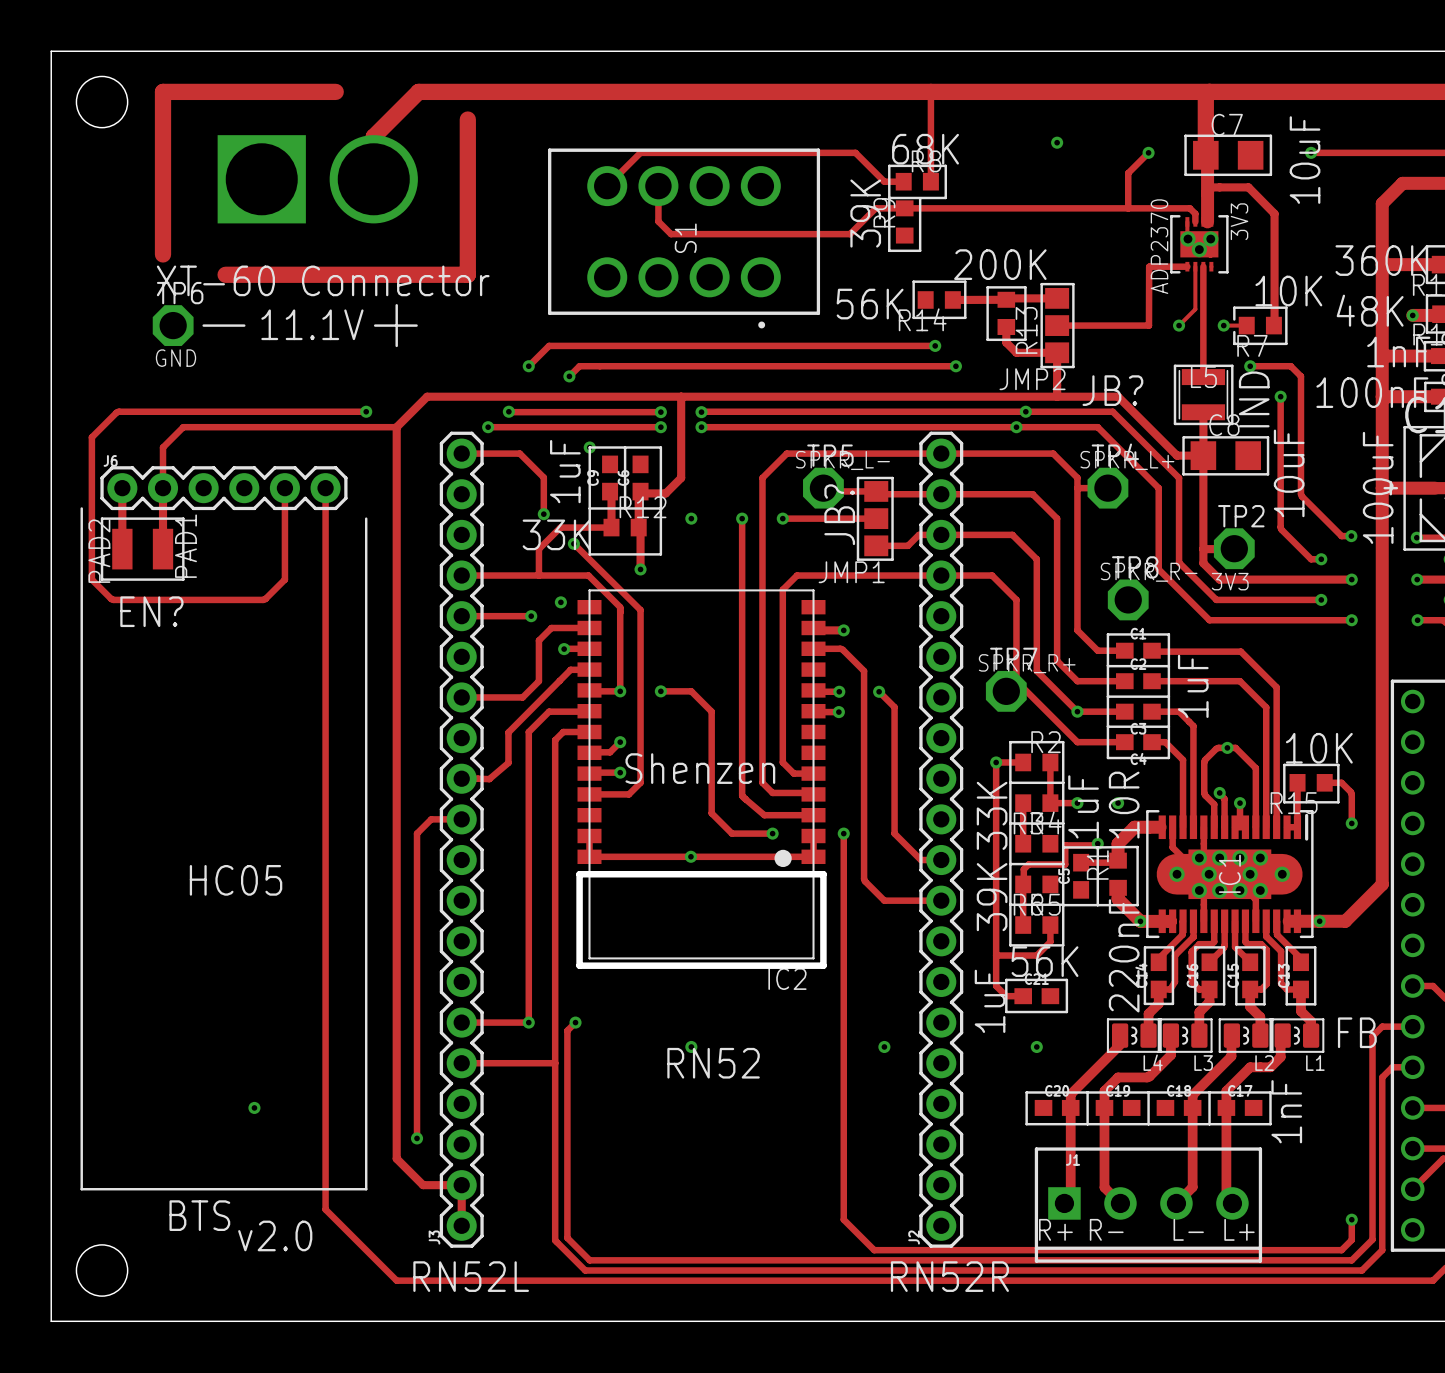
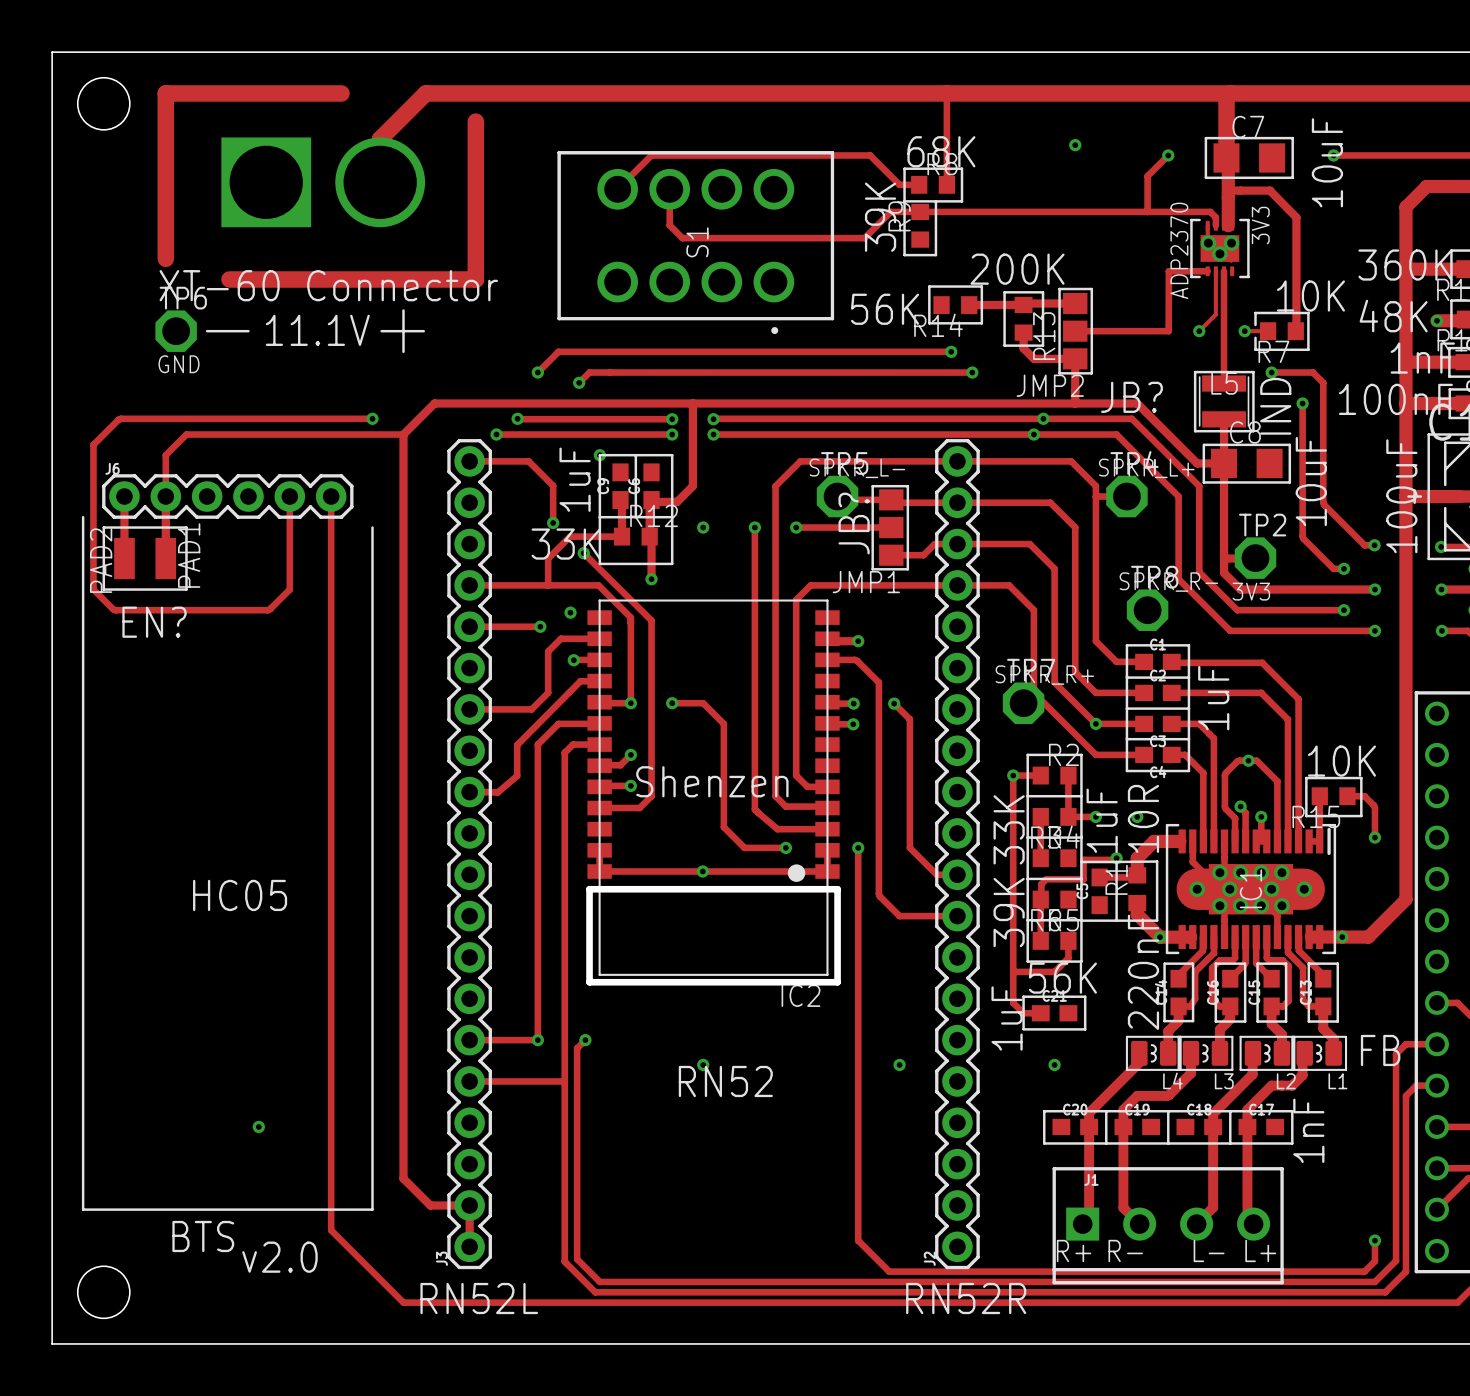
track: (461, 819) (431, 819) (417, 833) (417, 1138) -> none
via: (417, 1138) -> none

